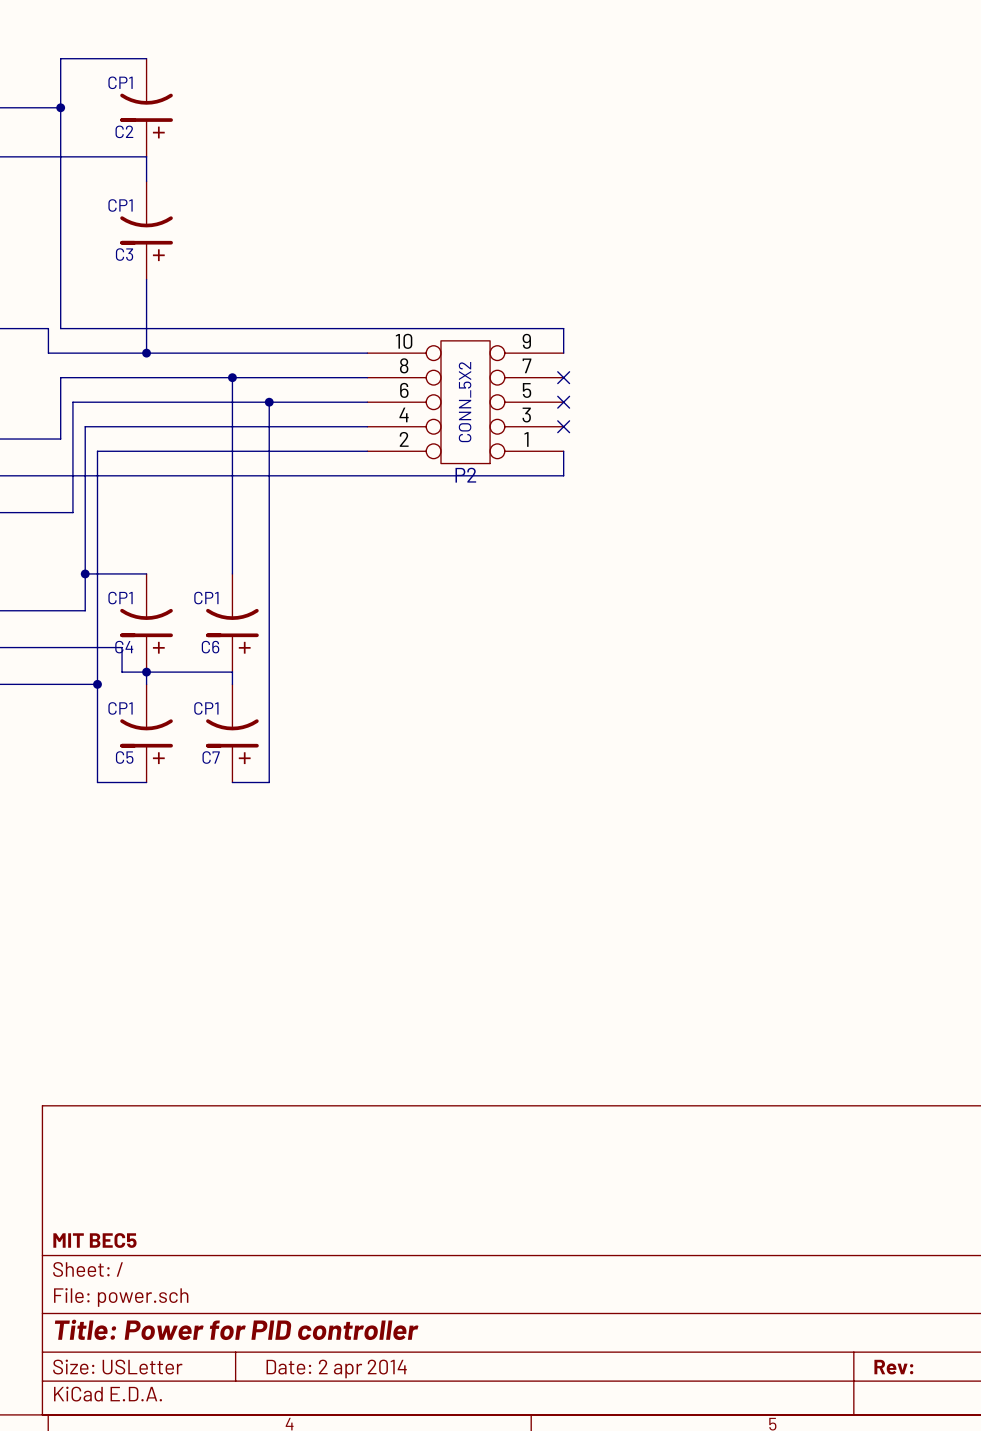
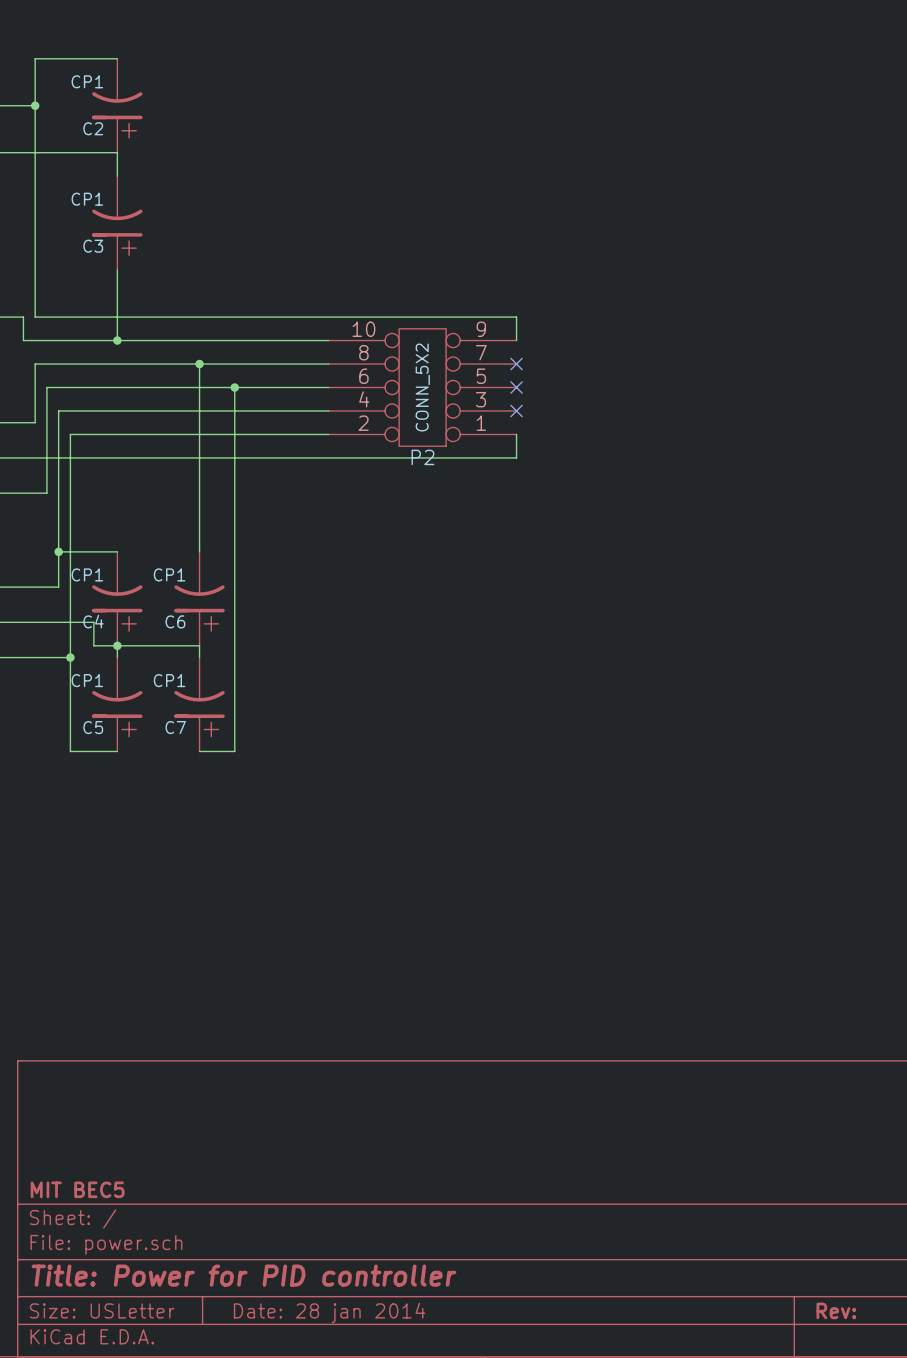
title block: Date: 2 apr 2014 (336, 1368) -> Date: 28 jan 2014 (329, 1312)

